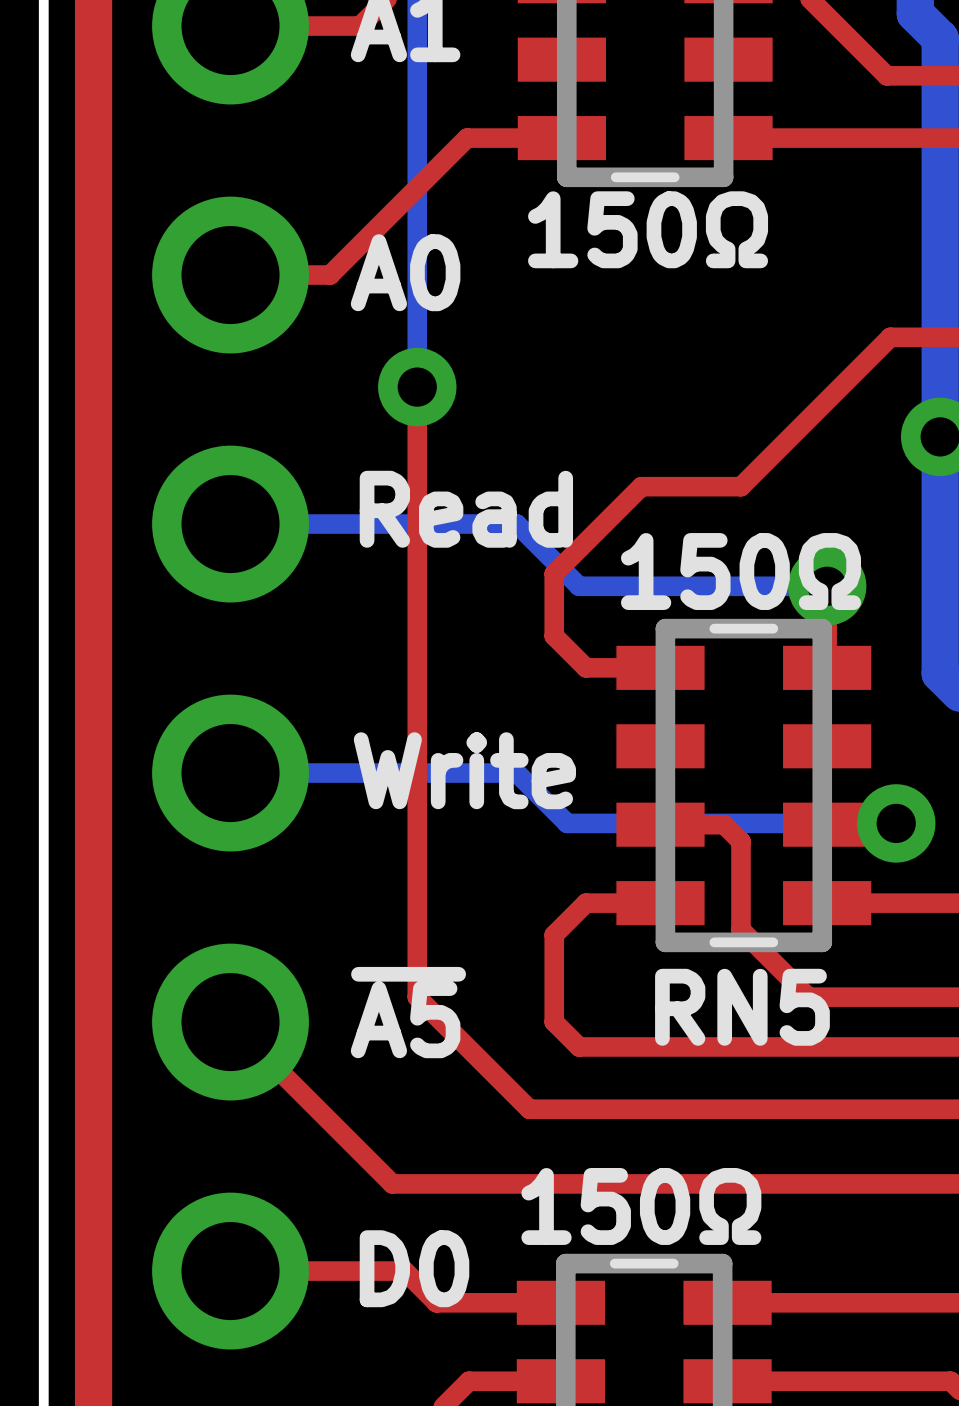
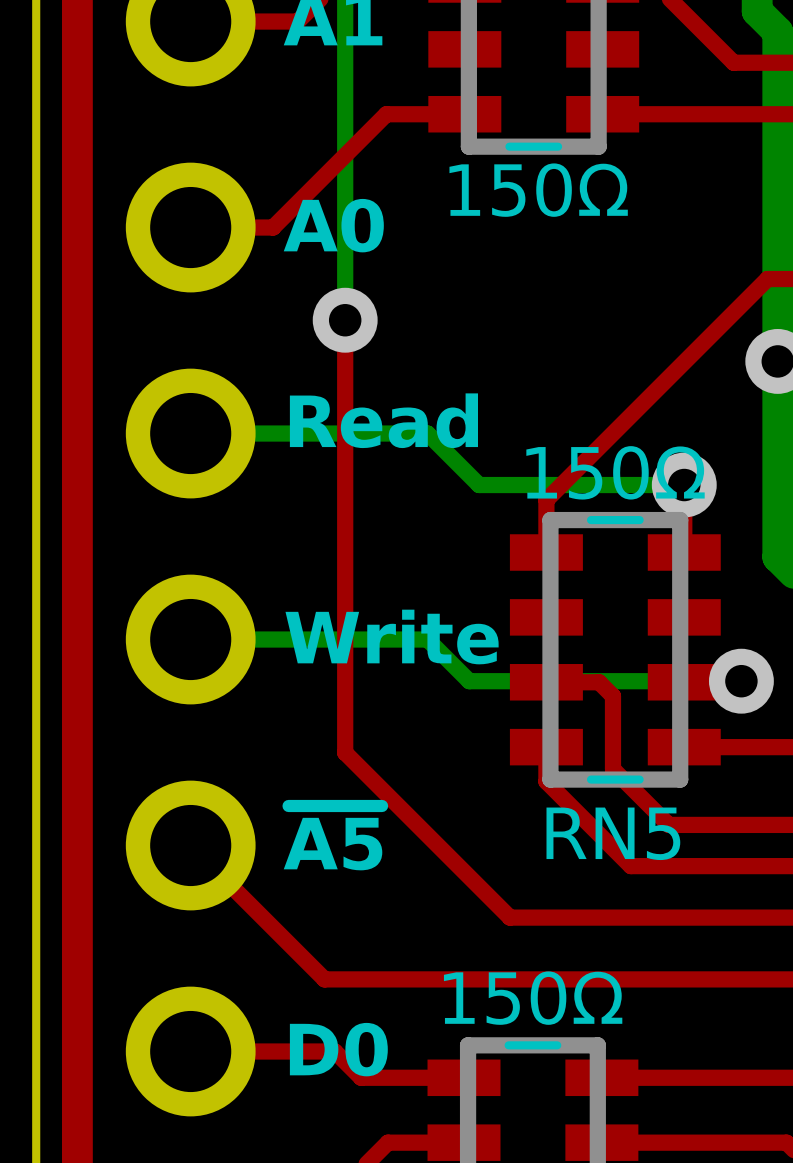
top track: (927, 337) (890, 337) (740, 486) (641, 486) (554, 573) (554, 636) (585, 667) (660, 667) -> (767, 279) (546, 500) (546, 552)
top track: (660, 903) (585, 903) (554, 934) (554, 1022) (579, 1046) (762, 1046) -> (546, 747) (546, 781) (630, 866)
top track: (417, 910) (417, 997) (529, 1109) (616, 1109) -> (345, 752) (509, 917)

